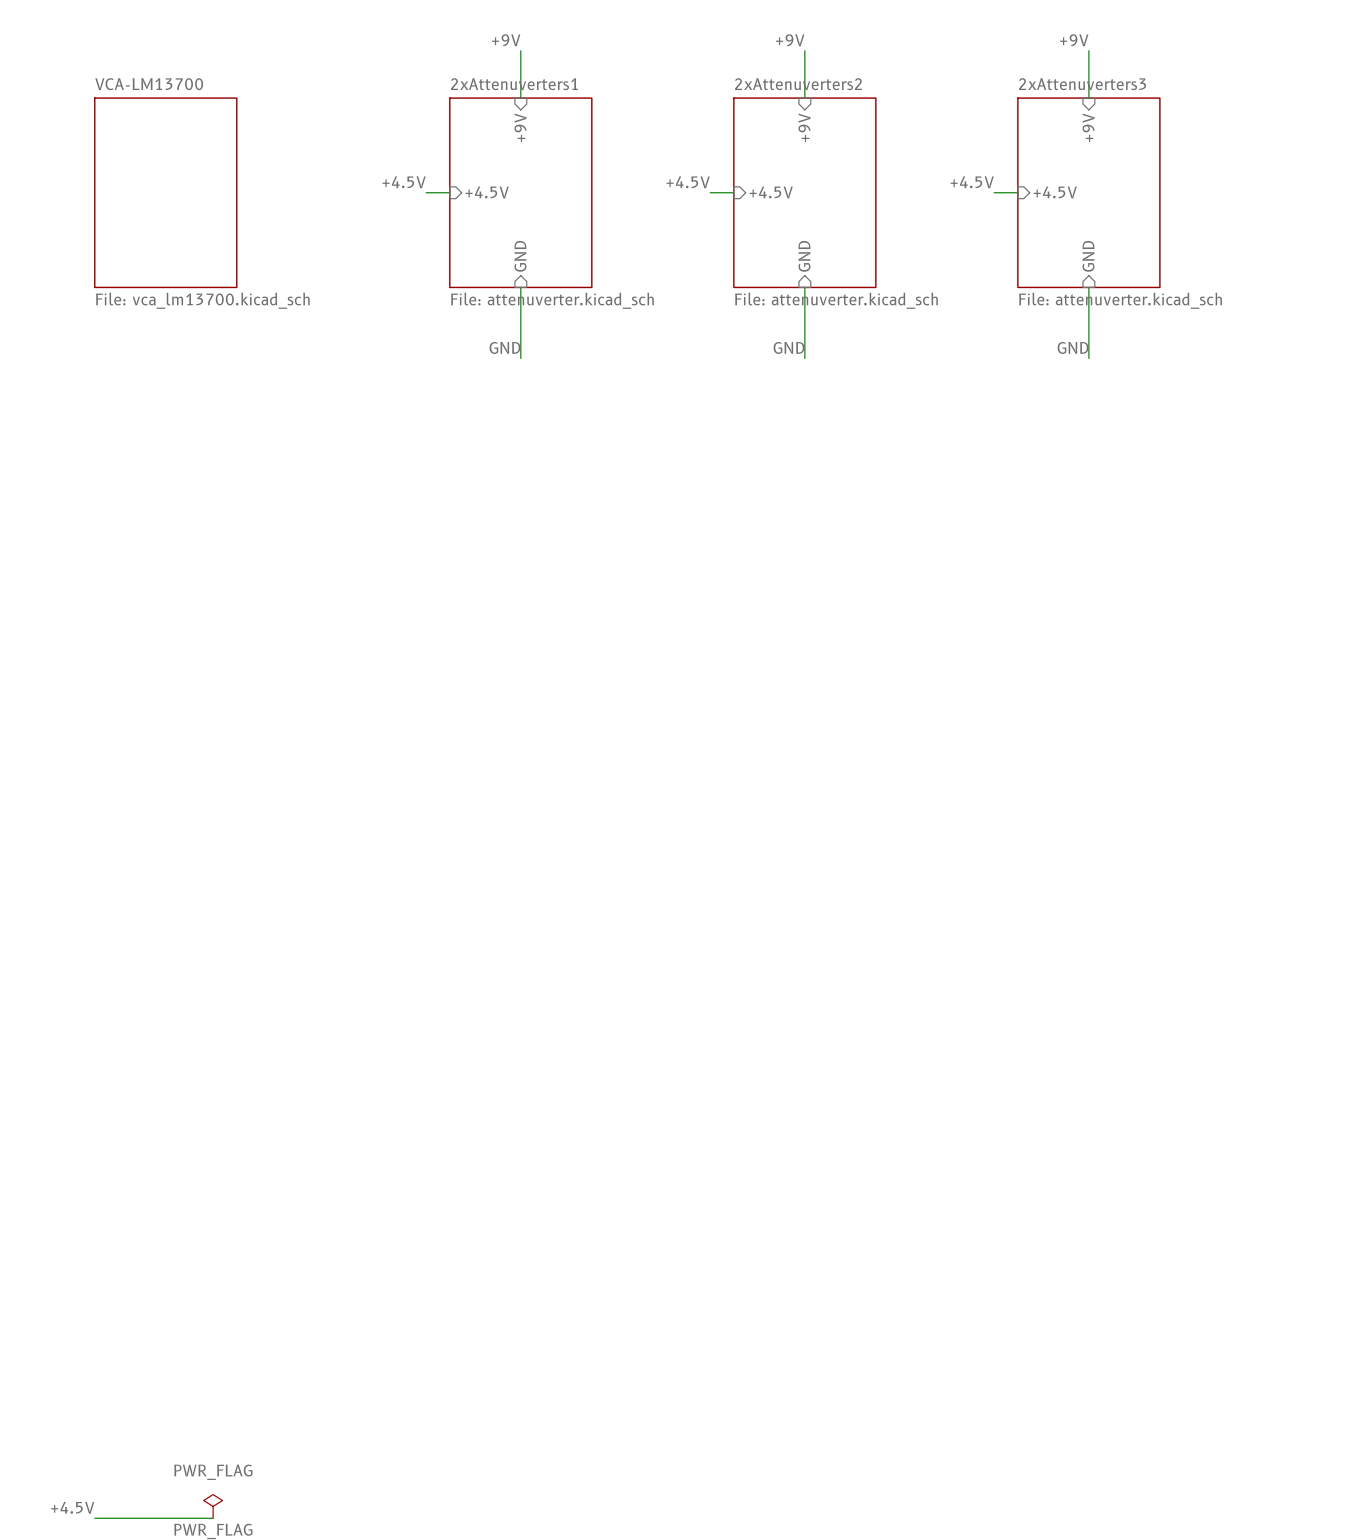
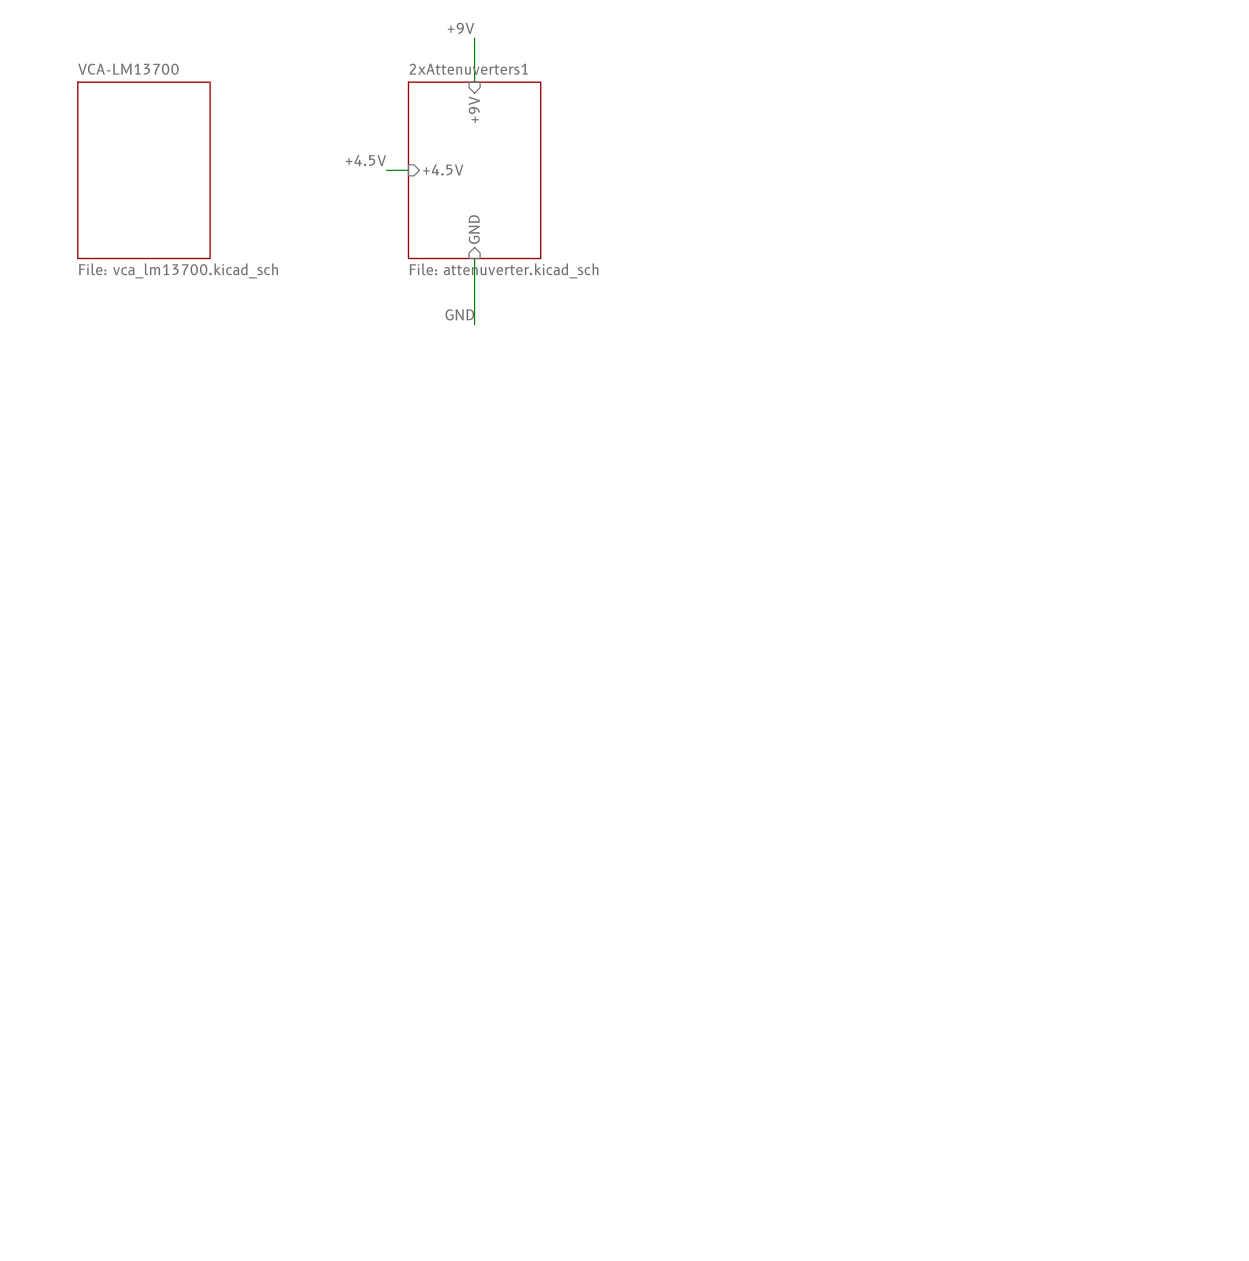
label: +9V (790, 40) -> none
label: +9V (1074, 40) -> none
wire: (804, 50) (804, 98) -> none
wire: (1088, 50) (1088, 98) -> none
sheet pin: +9V (804, 127) -> none
sheet pin: +9V (1088, 127) -> none
label: +4.5V (688, 182) -> none
label: +4.5V (972, 182) -> none
wire: (710, 192) (733, 192) -> none
sheet pin: +4.5V (771, 192) -> none
sheet 2xAttenuverters2: File: attenuverter.kicad_sch (804, 192) -> none
wire: (994, 192) (1017, 192) -> none
sheet pin: +4.5V (1055, 192) -> none
sheet 2xAttenuverters3: File: attenuverter.kicad_sch (1088, 192) -> none
sheet pin: GND (804, 256) -> none
sheet pin: GND (1088, 256) -> none
wire: (804, 287) (804, 358) -> none
wire: (1088, 287) (1088, 358) -> none
label: GND (789, 347) -> none
label: GND (1073, 347) -> none

